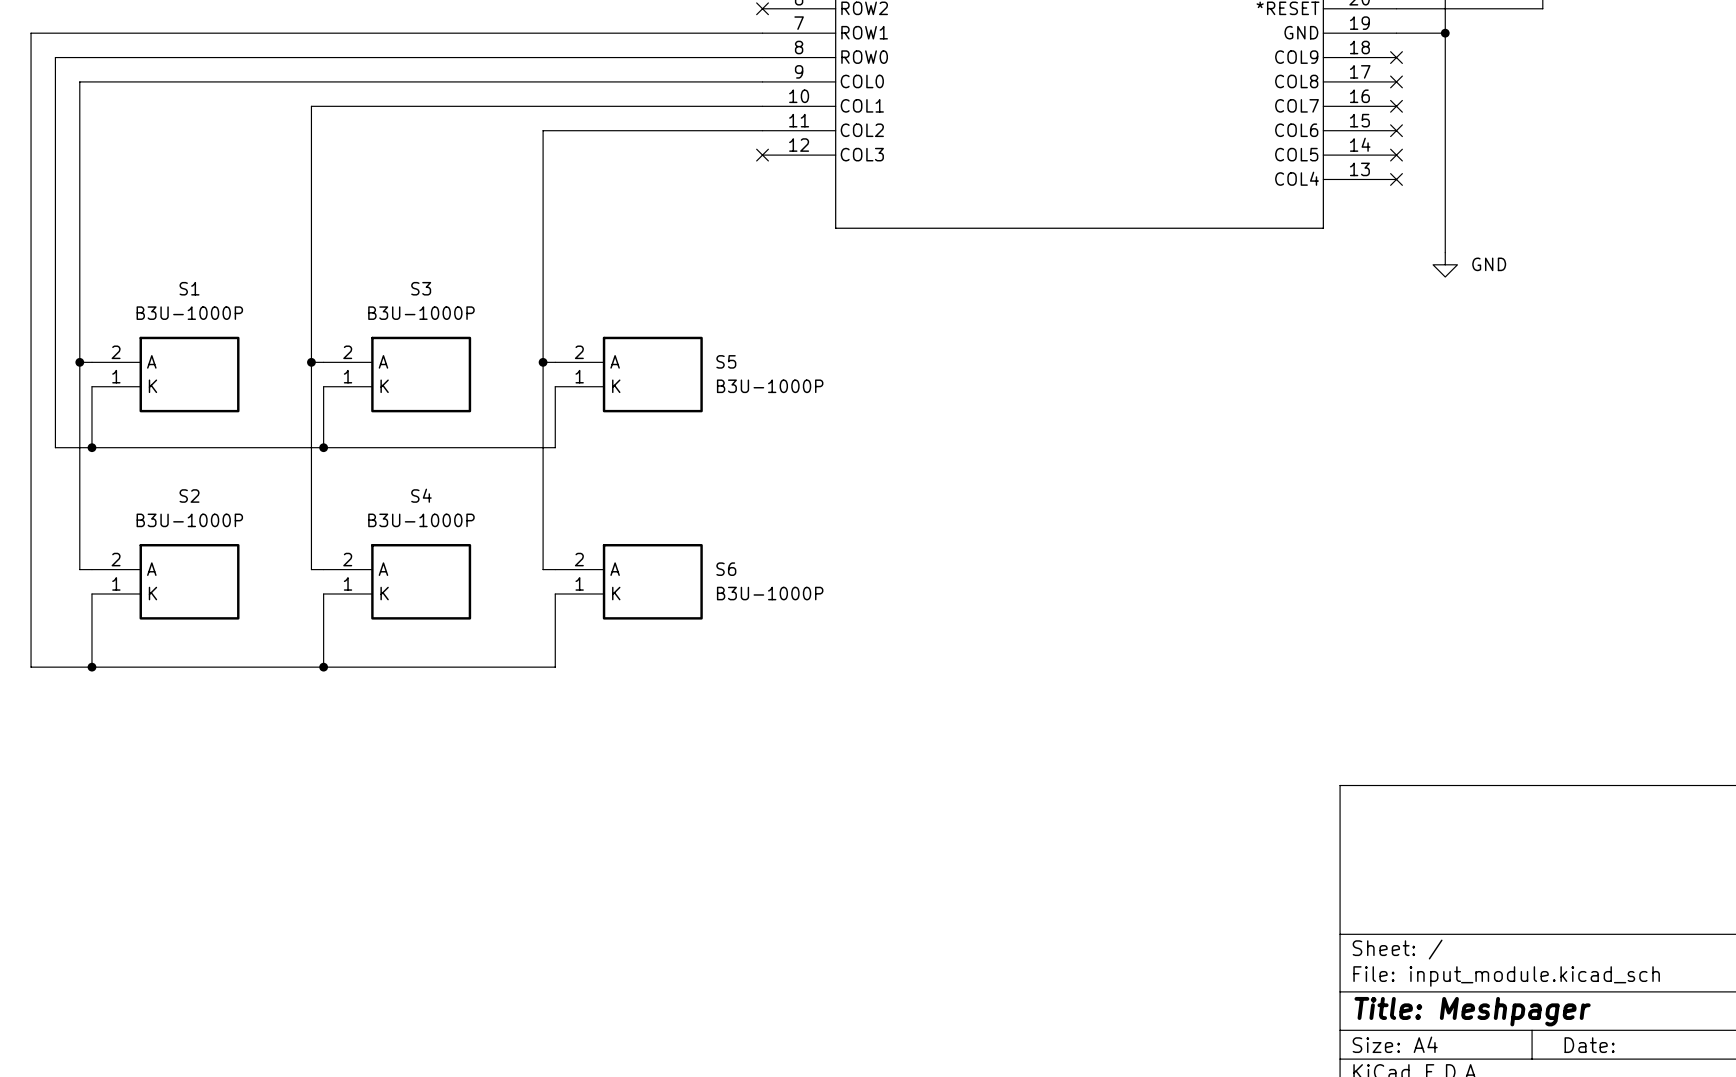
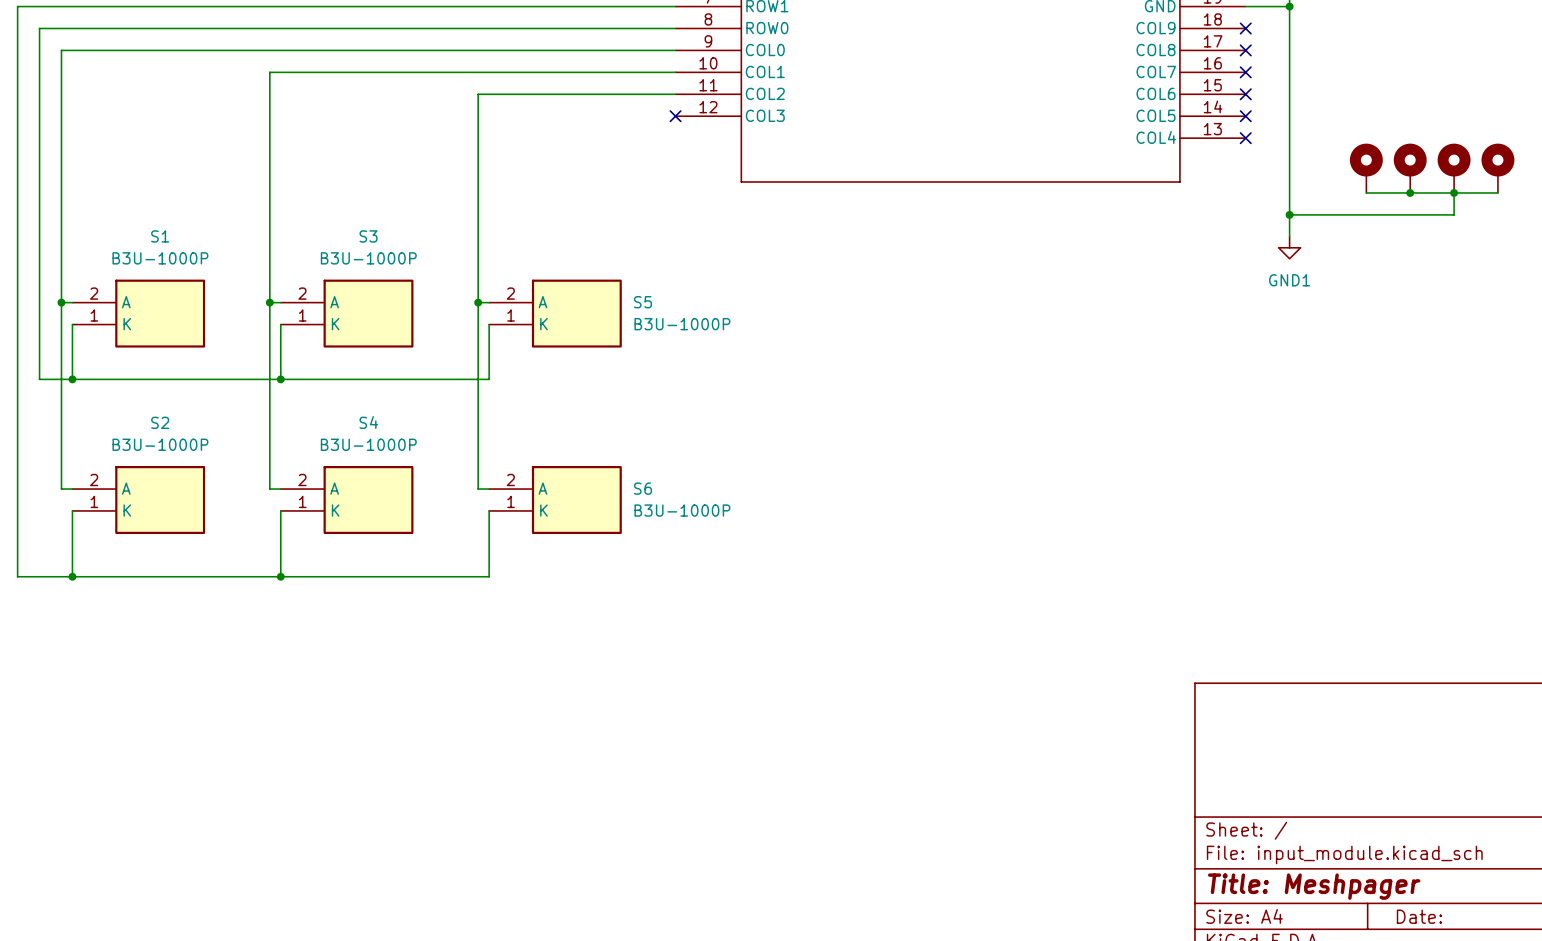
part: none -> (1366, 168)
part: none -> (1410, 168)
part: none -> (1454, 168)
part: none -> (1497, 168)
wire: none -> (1366, 192) (1497, 192)
junction: none -> (1410, 192)
wire: none -> (1454, 192) (1454, 214) (1289, 214)
junction: none -> (1454, 192)
wire: none -> (1289, 203) (1289, 236)
power symbol: GND (1445, 264) -> none
junction: none -> (1289, 214)
power symbol: none -> GND1 (1289, 247)

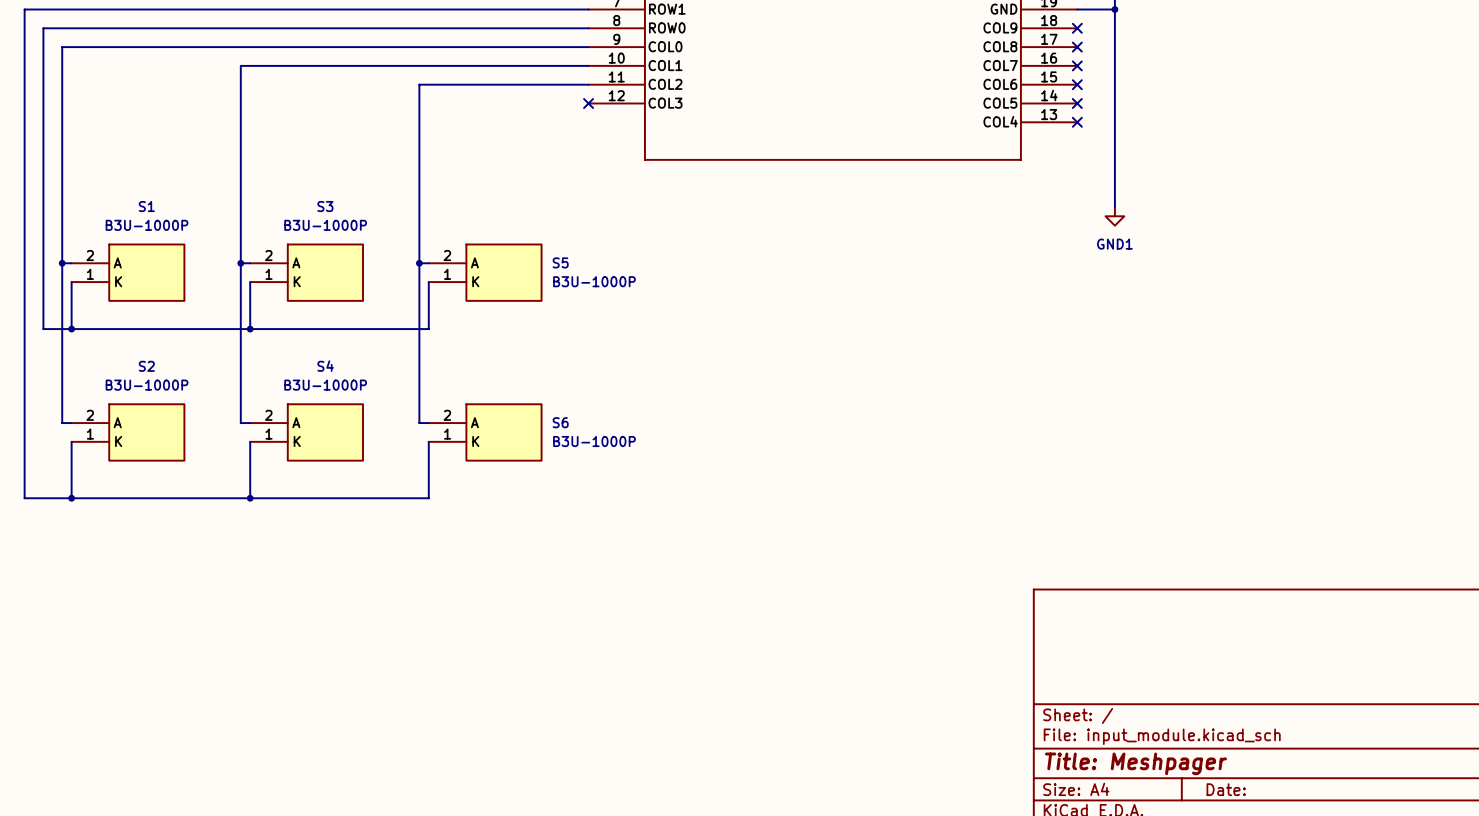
part: (1366, 168) -> none
part: (1410, 168) -> none
part: (1454, 168) -> none
part: (1497, 168) -> none
wire: (1366, 192) (1497, 192) -> none
junction: (1410, 192) -> none
wire: (1454, 192) (1454, 214) (1289, 214) -> none
junction: (1454, 192) -> none
junction: (1289, 214) -> none

